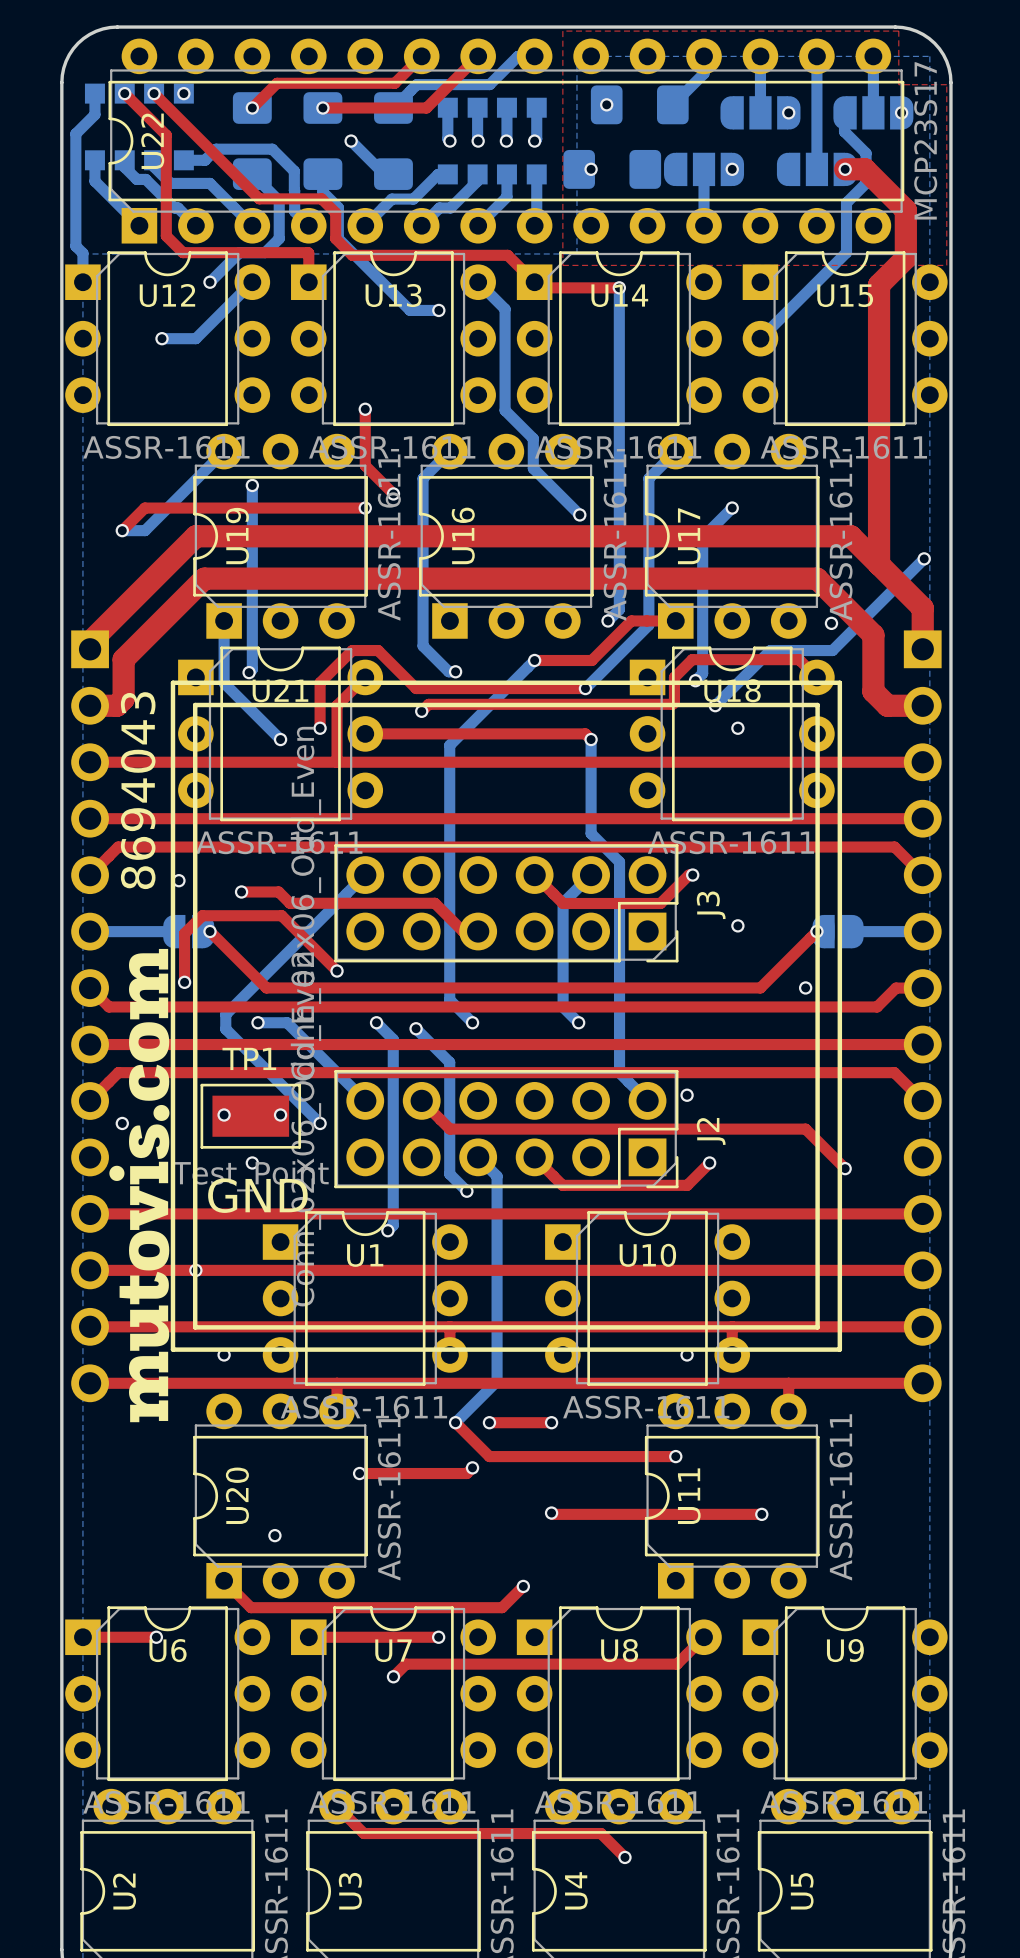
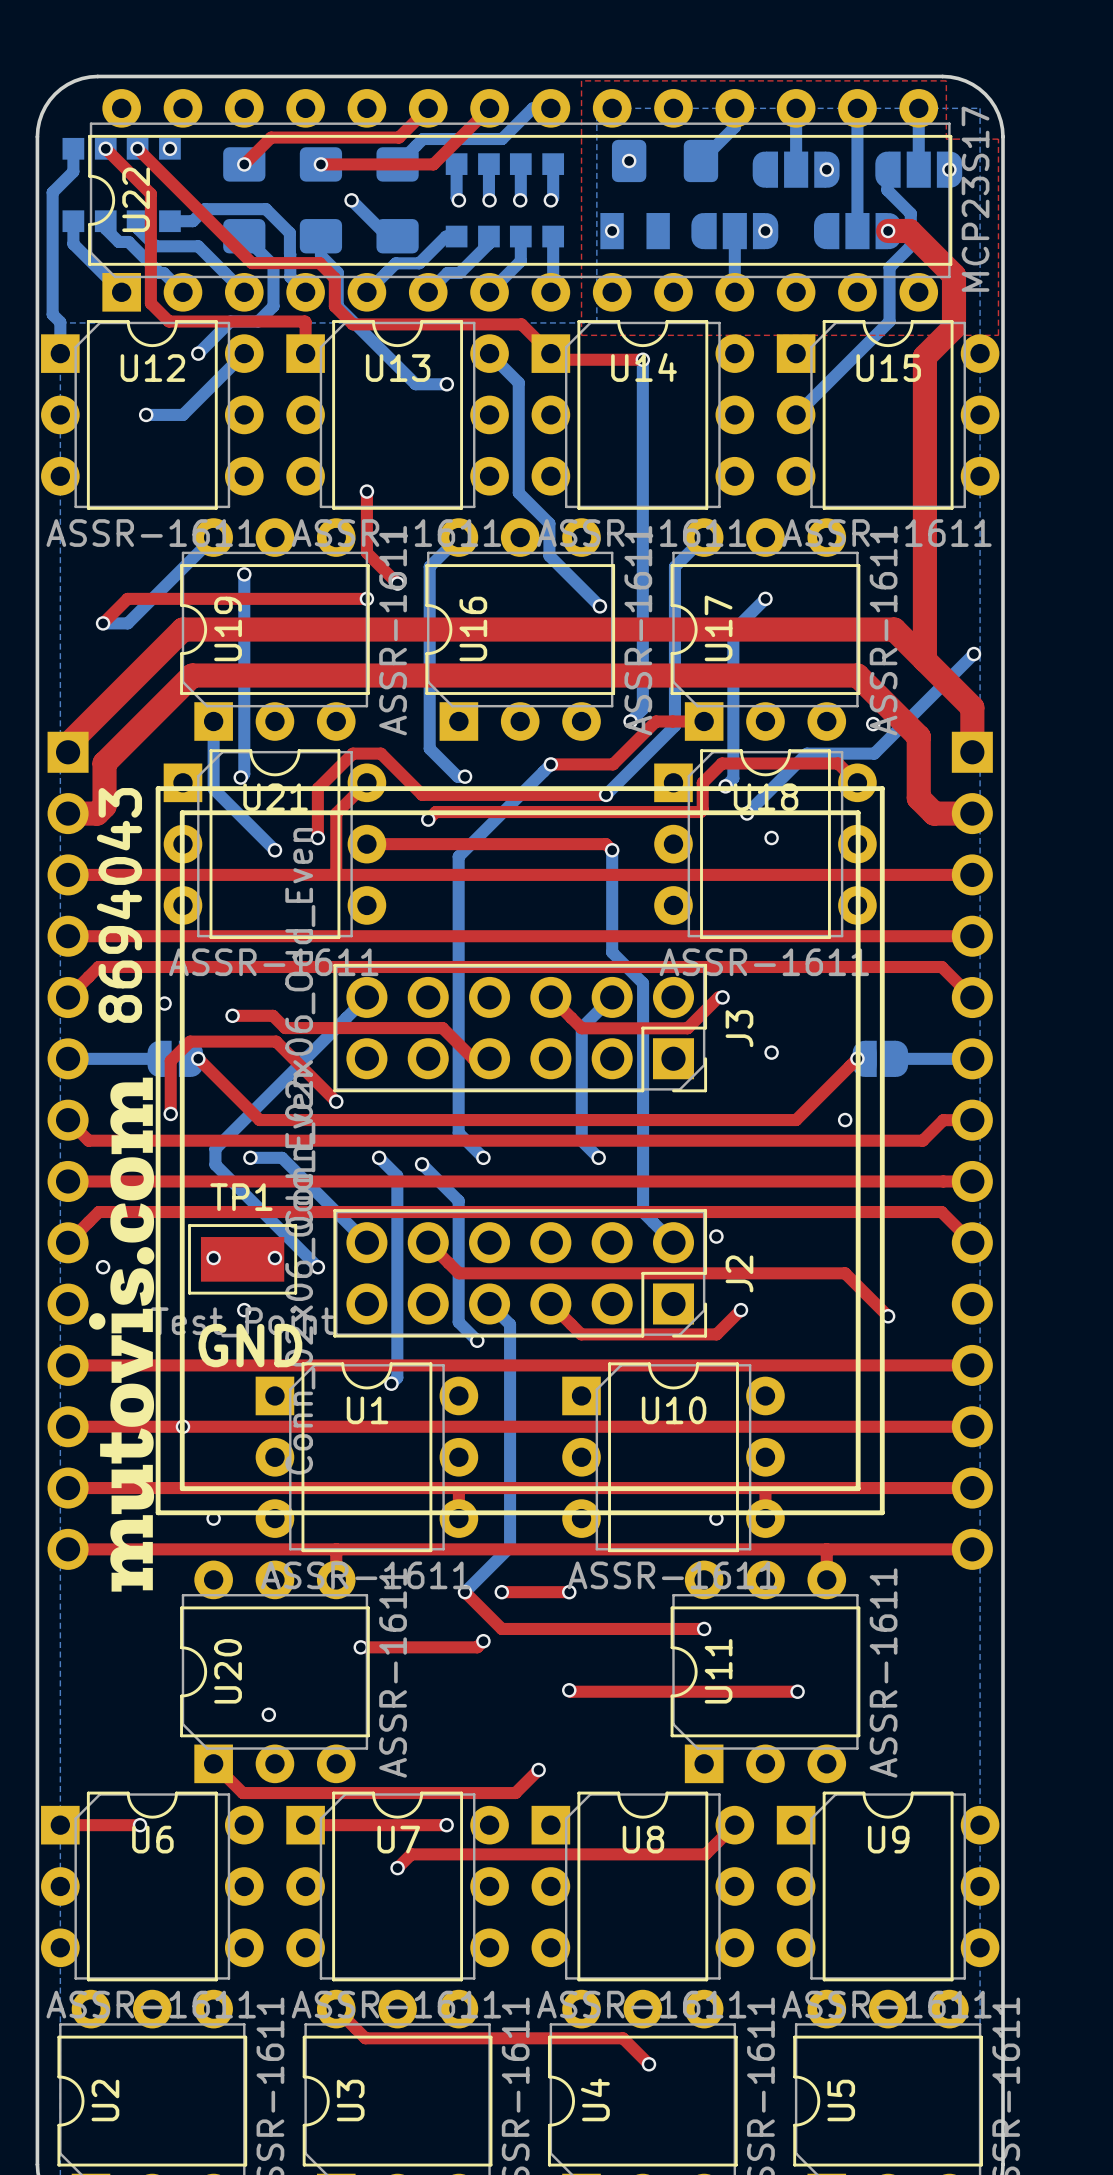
part footprint: [563, 149, 662, 189] -> [600, 213, 670, 250]

